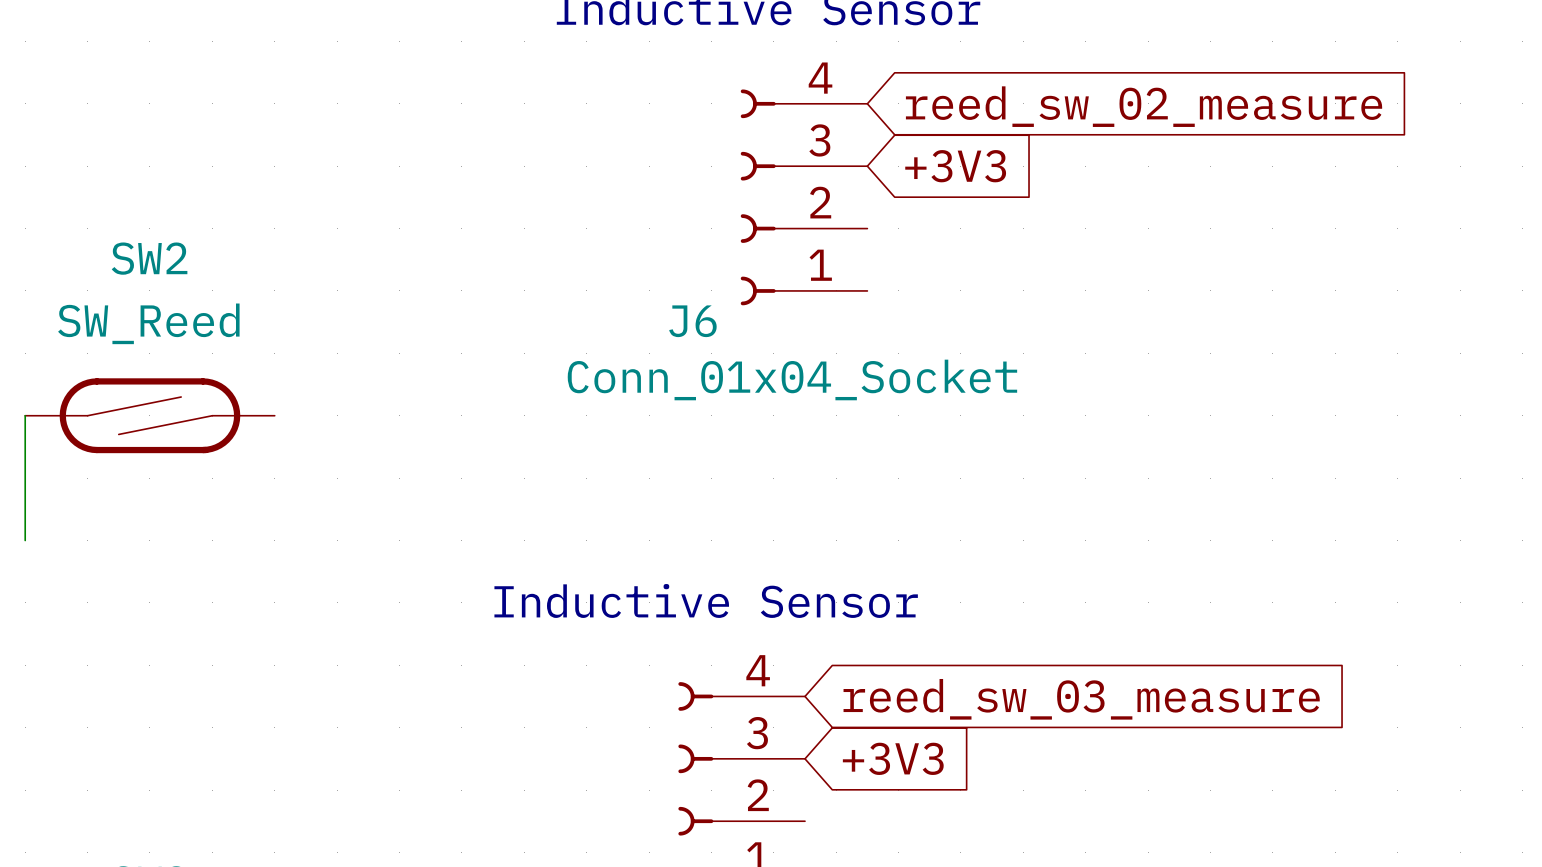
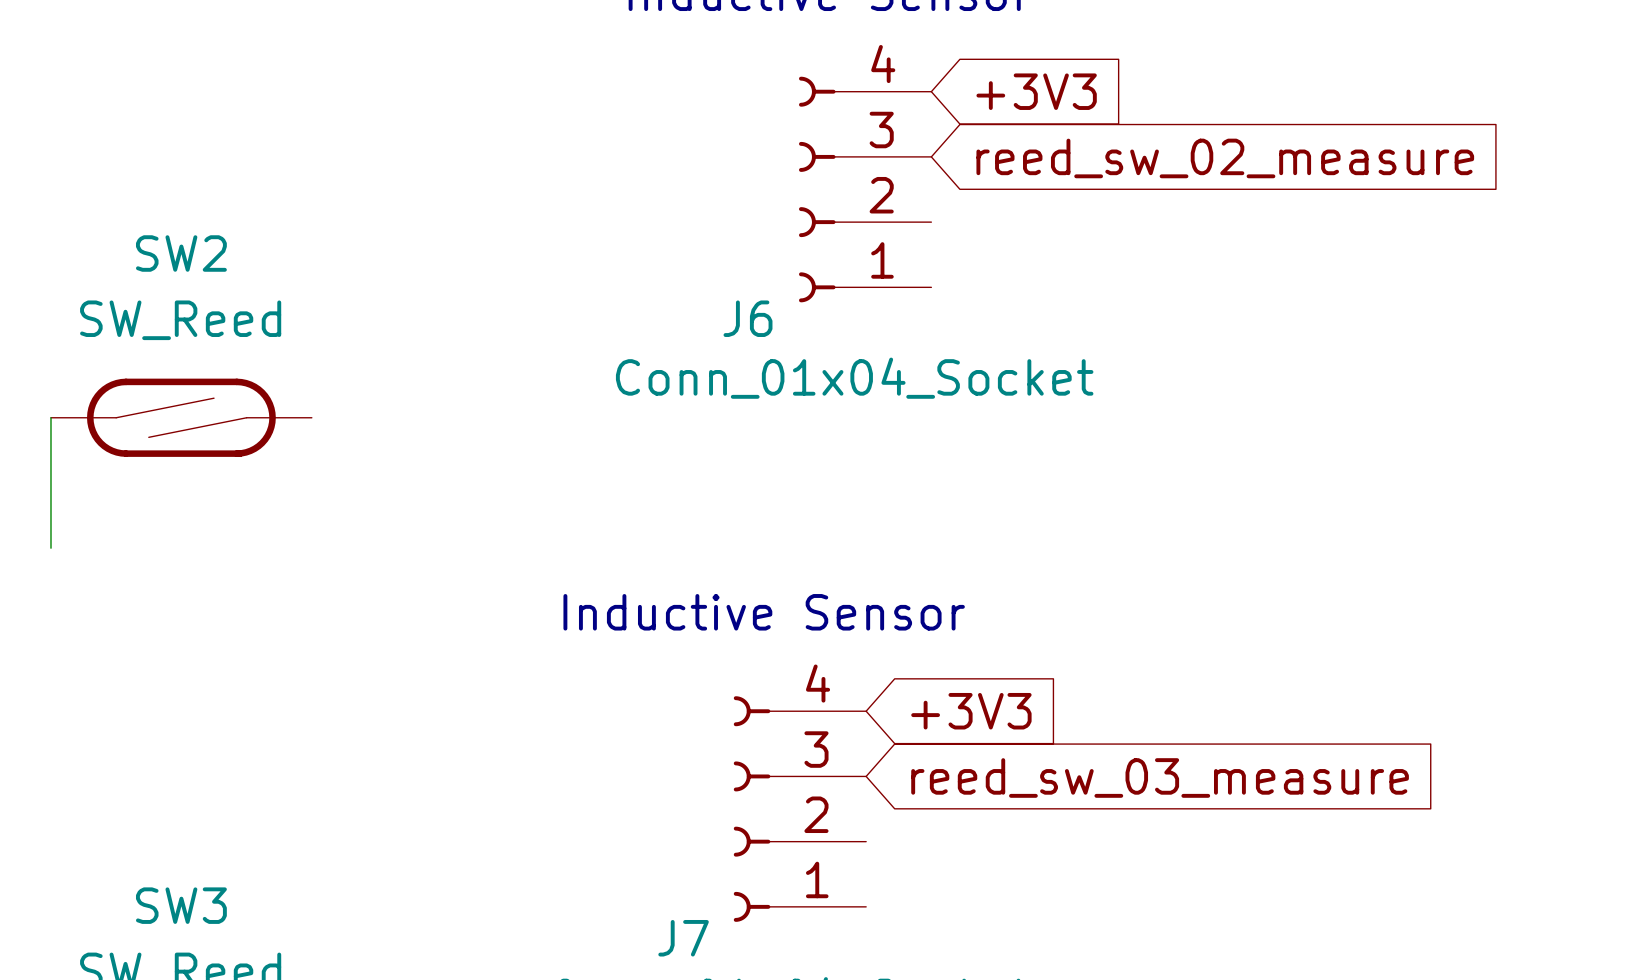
global label: reed_sw_02_measure (1144, 106) -> +3V3 (1036, 91)
global label: +3V3 (955, 166) -> reed_sw_02_measure (1225, 158)
global label: reed_sw_03_measure (1081, 699) -> +3V3 (971, 711)
global label: +3V3 (893, 758) -> reed_sw_03_measure (1160, 777)

